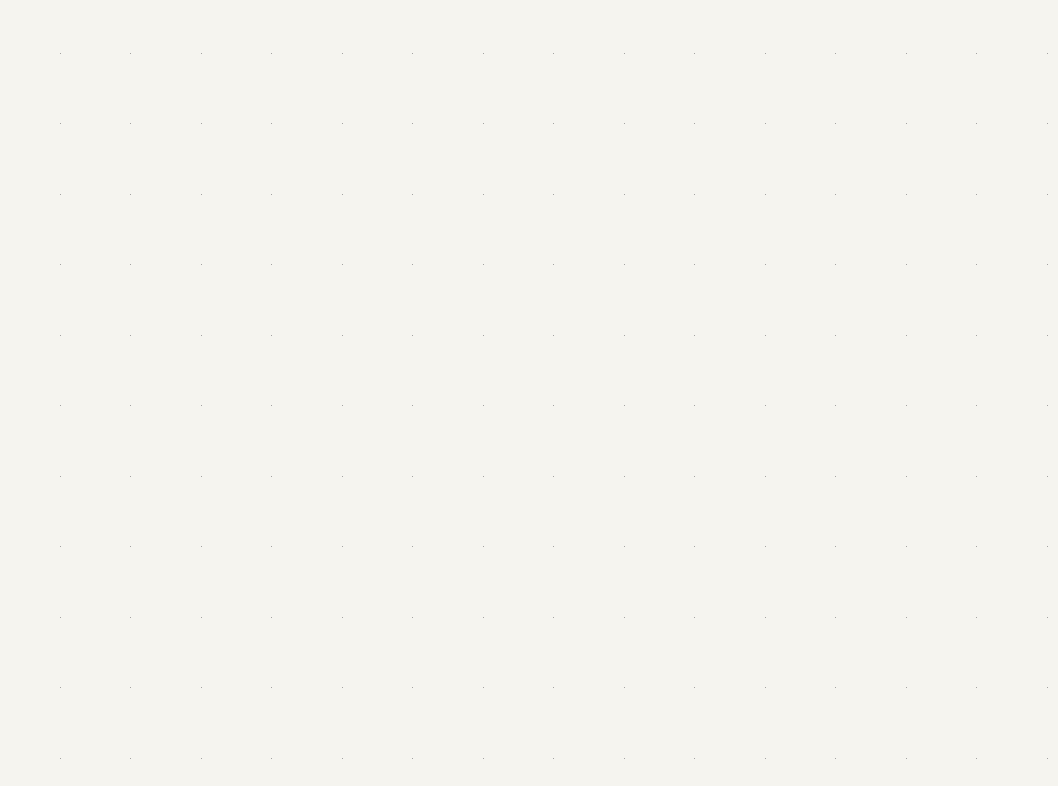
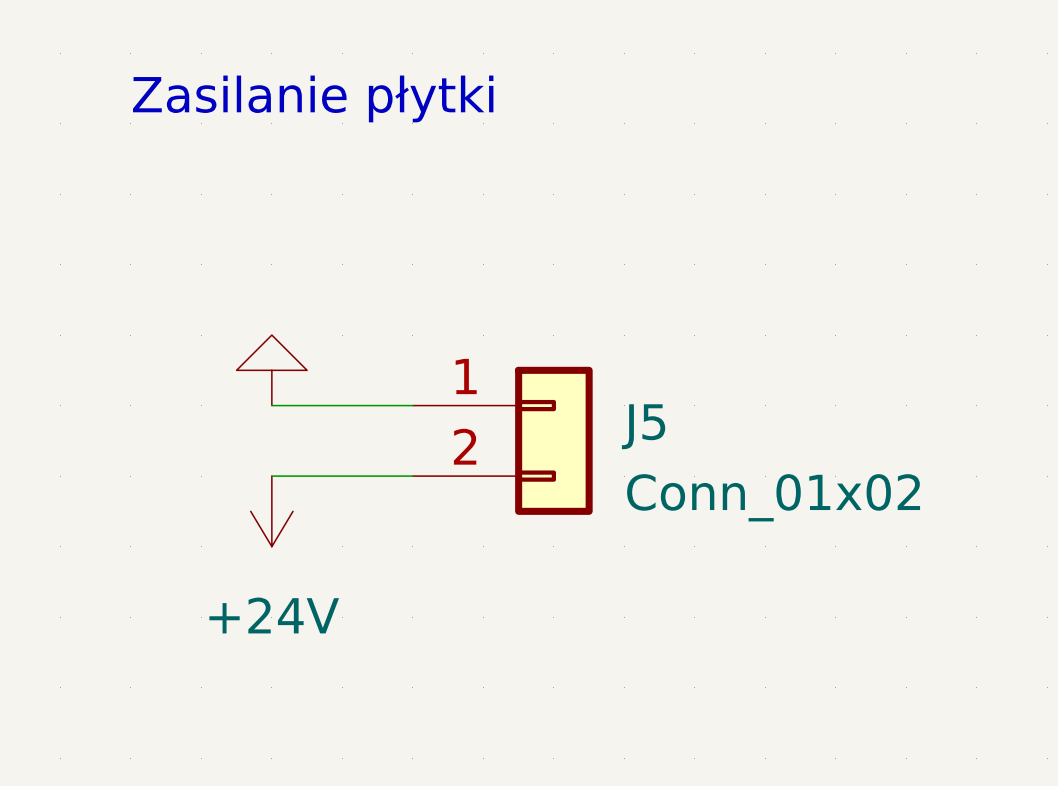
text: none -> Zasilanie płytki (313, 98)
power symbol: none -> (271, 370)
wire: none -> (271, 405) (412, 405)
J5: none -> Conn_01x02 (502, 440)
wire: none -> (271, 476) (412, 476)
power symbol: none -> +24V (271, 511)

